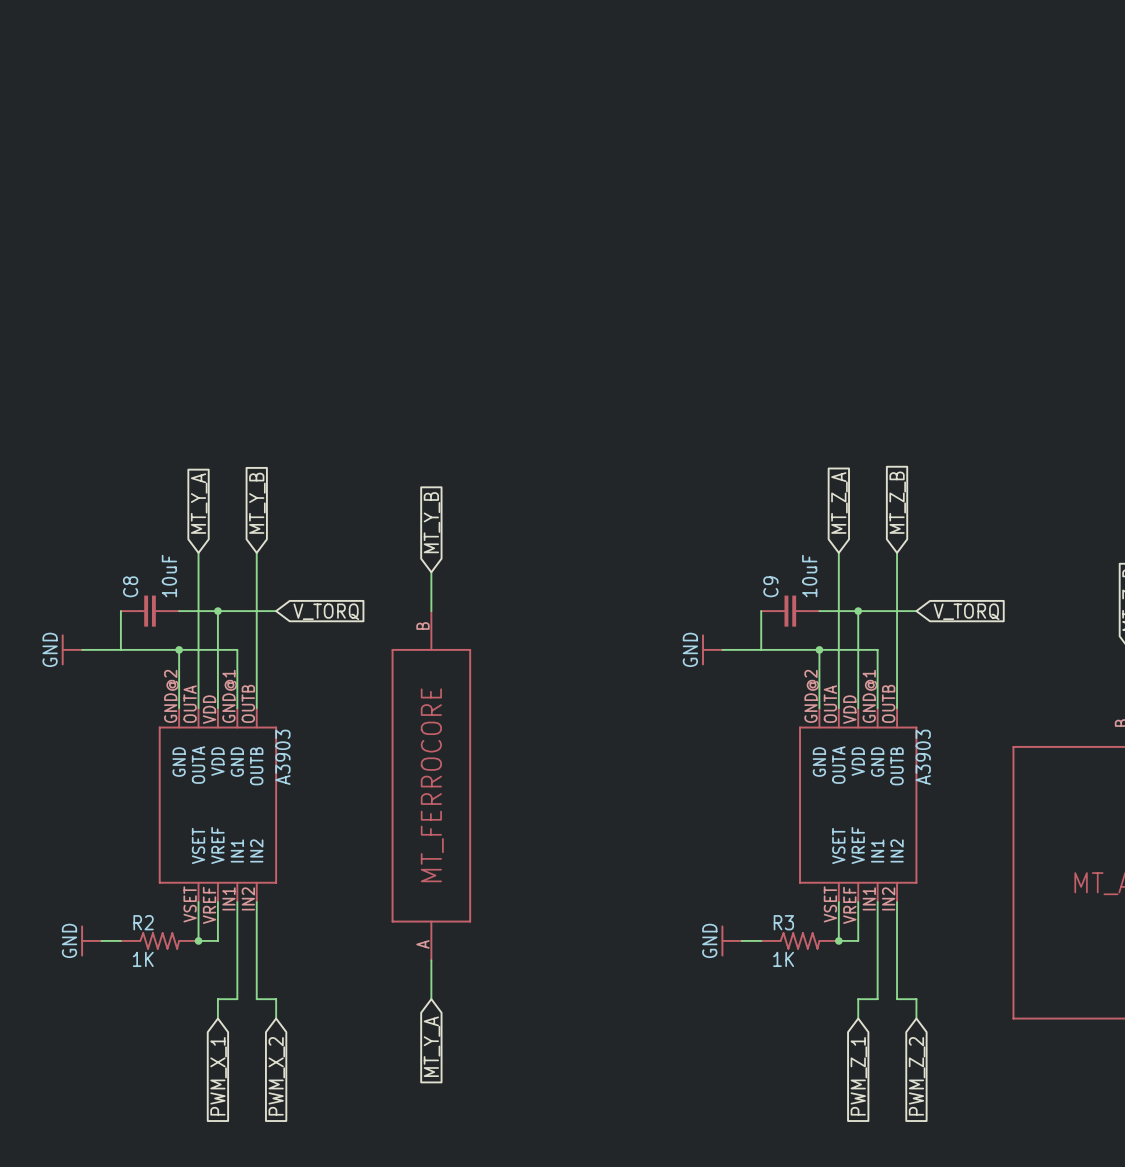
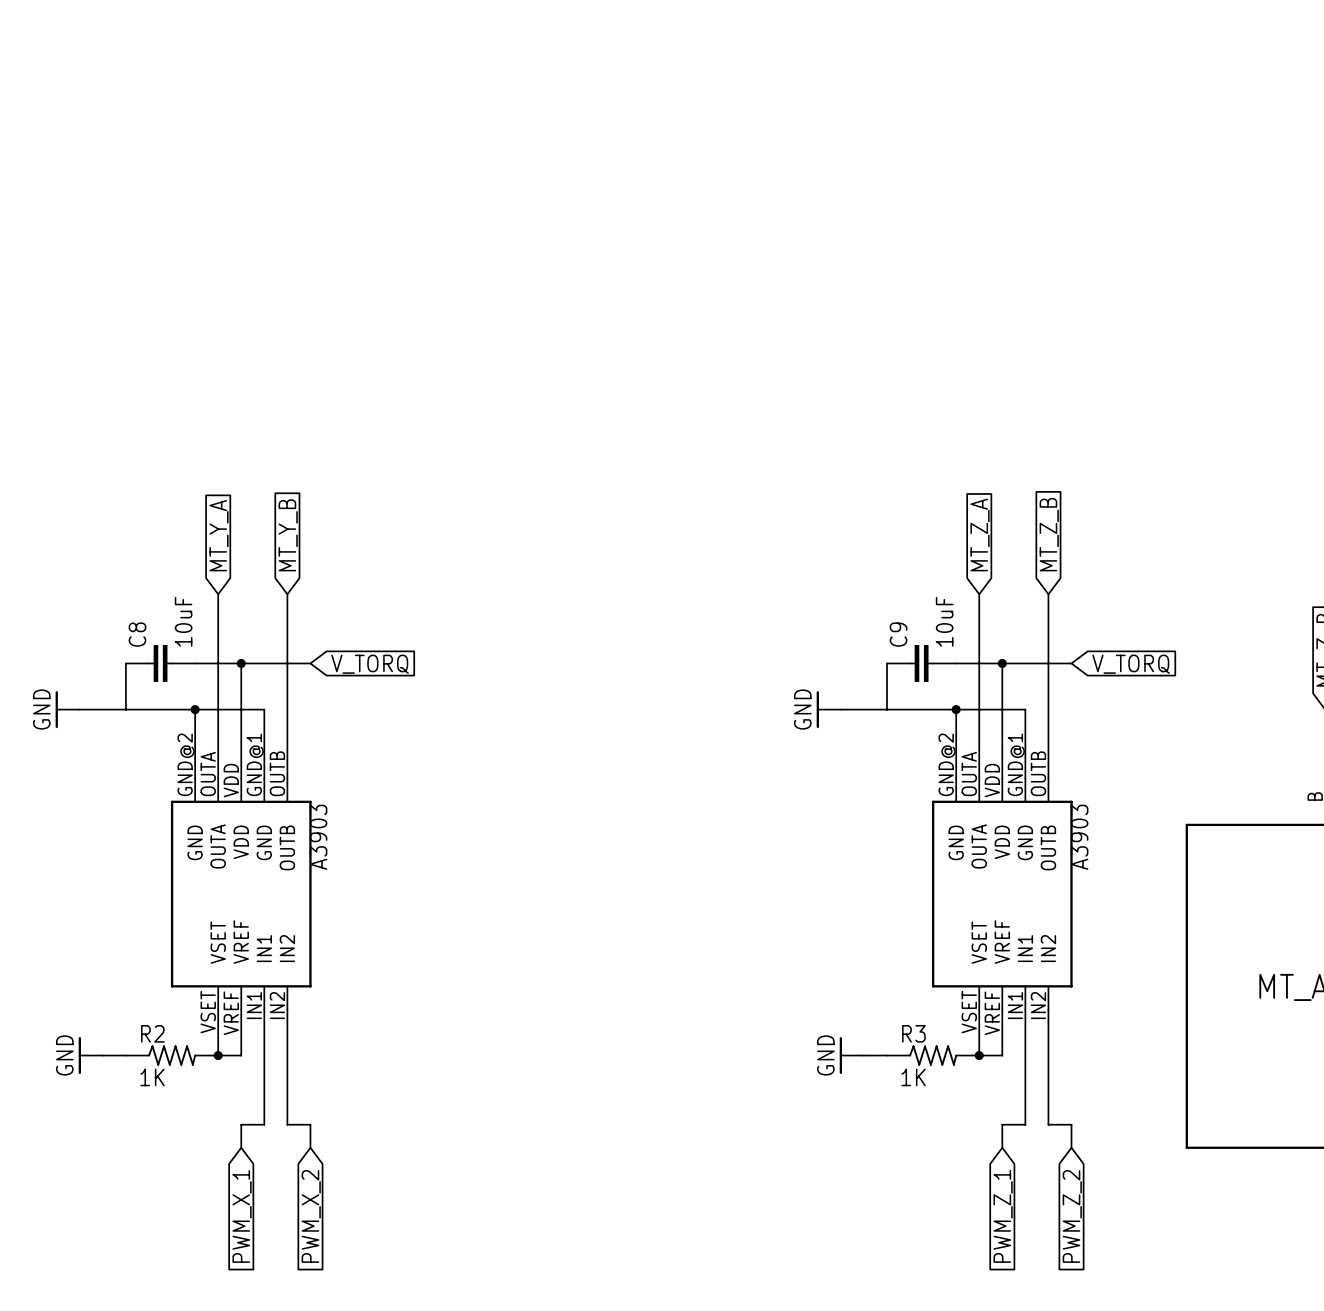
global label: MT_Y_B (432, 522) -> none
wire: (431, 572) (431, 611) -> none
part: (431, 785) -> none
wire: (431, 960) (431, 999) -> none
global label: MT_Y_A (432, 1046) -> none

